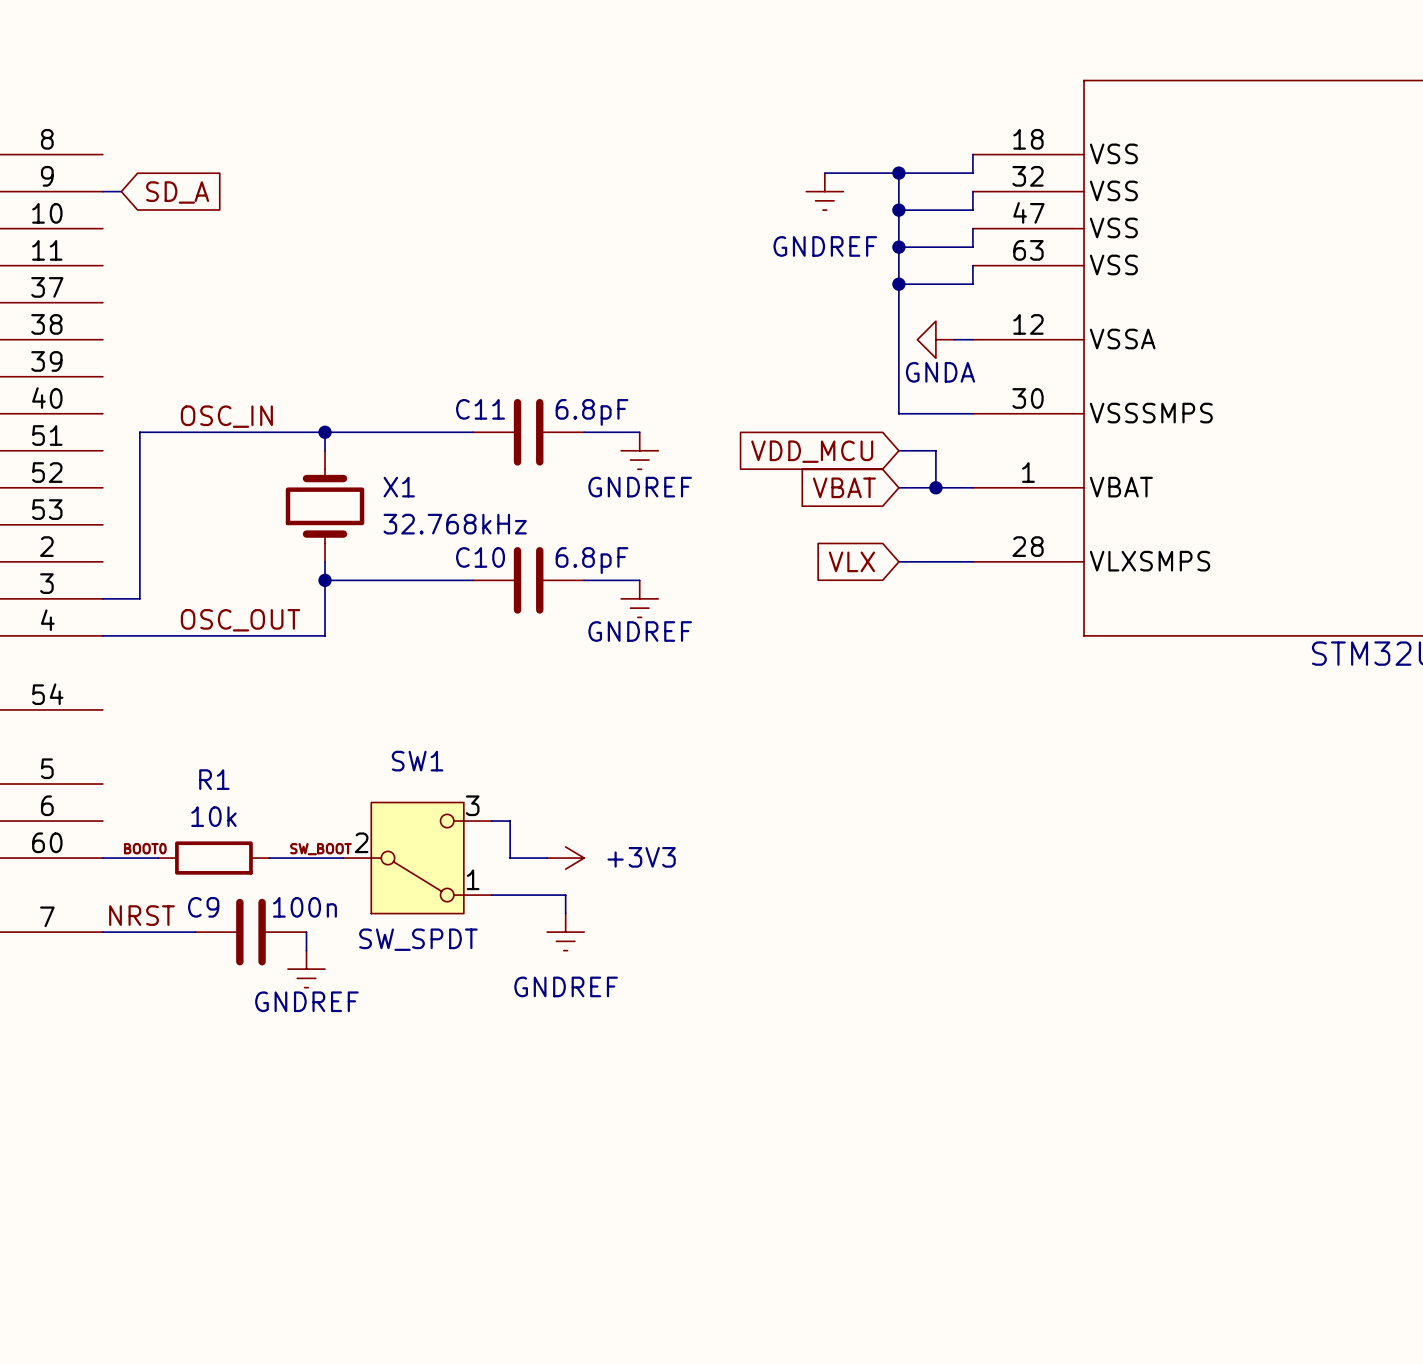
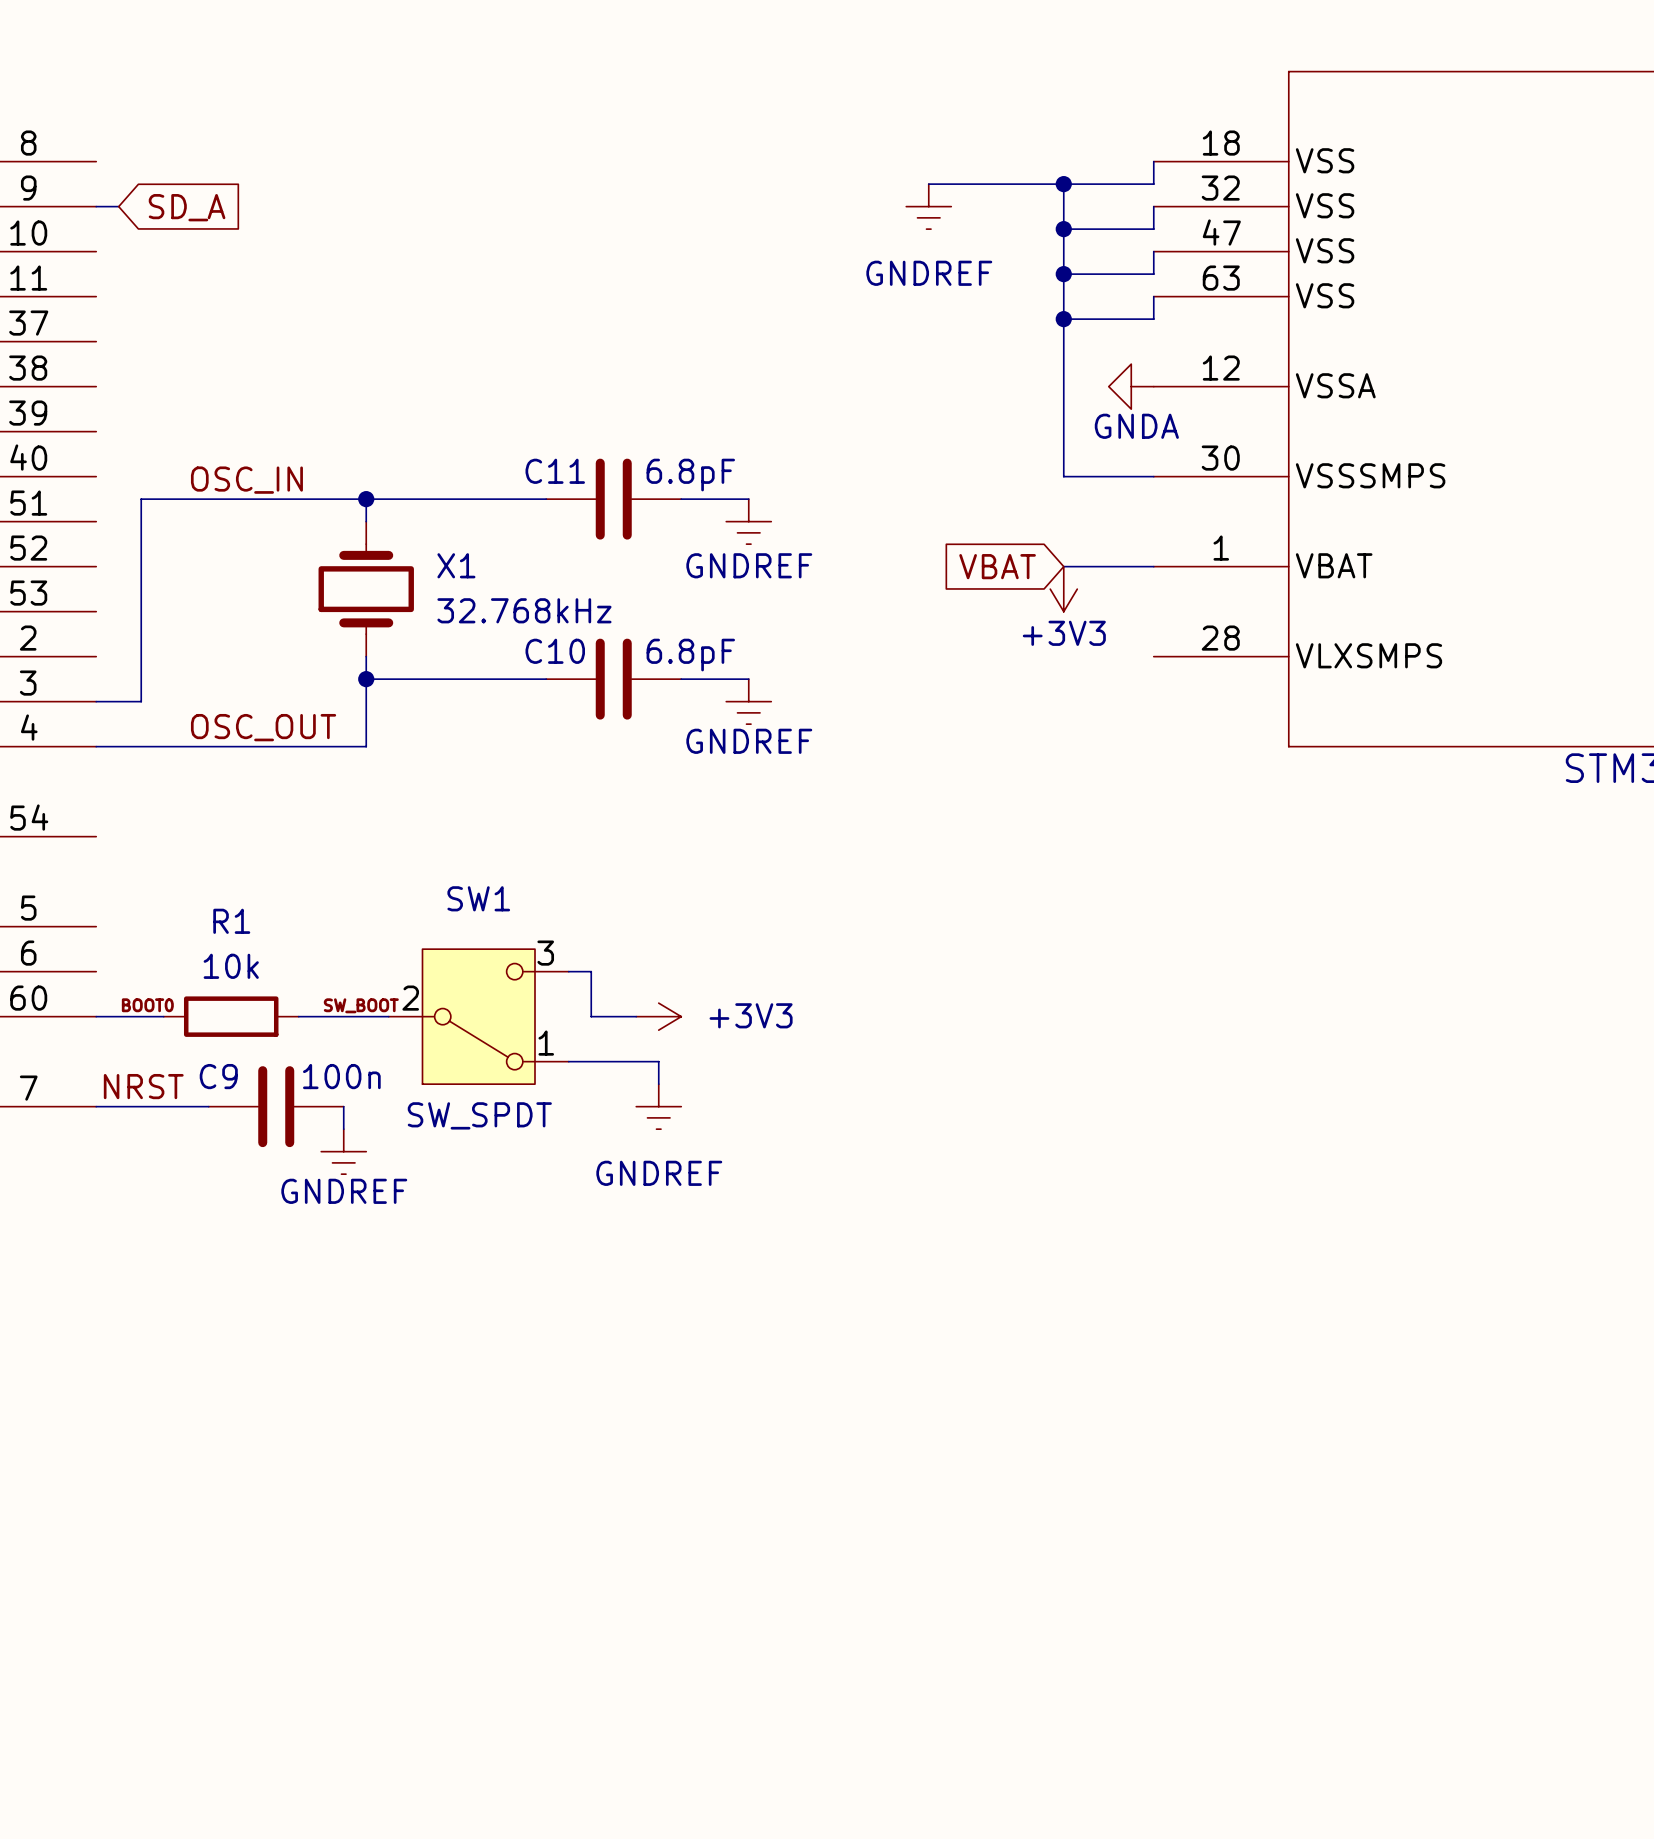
wire: none -> (928, 184) (973, 184)
power symbol position: GNDREF (824, 191) -> GNDREF (928, 206)
power symbol position: GNDA (935, 339) -> GNDA (1131, 386)
wire: (898, 450) (935, 450) (935, 487) -> none
global label: VDD_MCU (812, 451) -> none
junction: (935, 487) -> none
power symbol: none -> +3V3 (1063, 589)
global label: VLX (851, 561) -> none
wire: (898, 561) (972, 561) -> none

